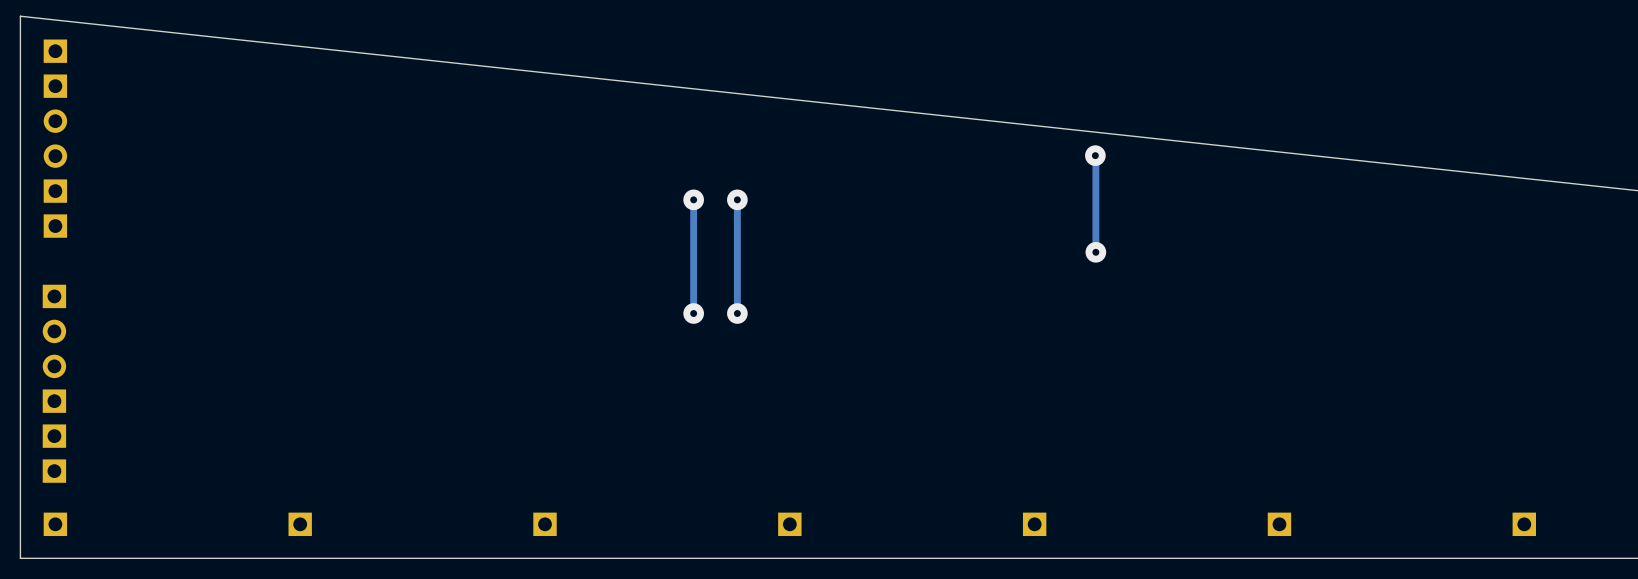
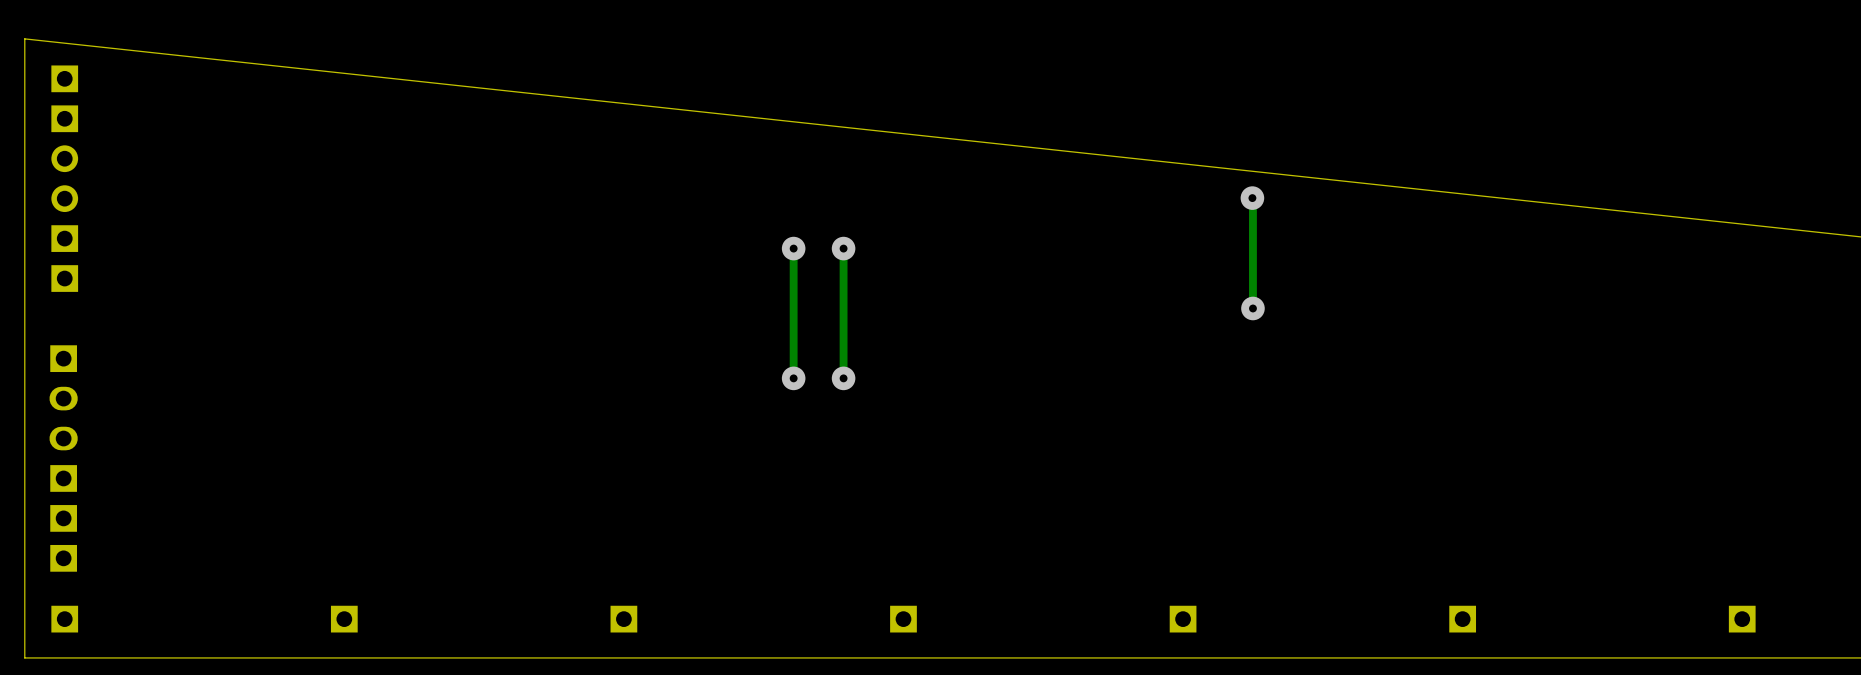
part footprint: [42, 284, 67, 379] -> [49, 345, 78, 451]

